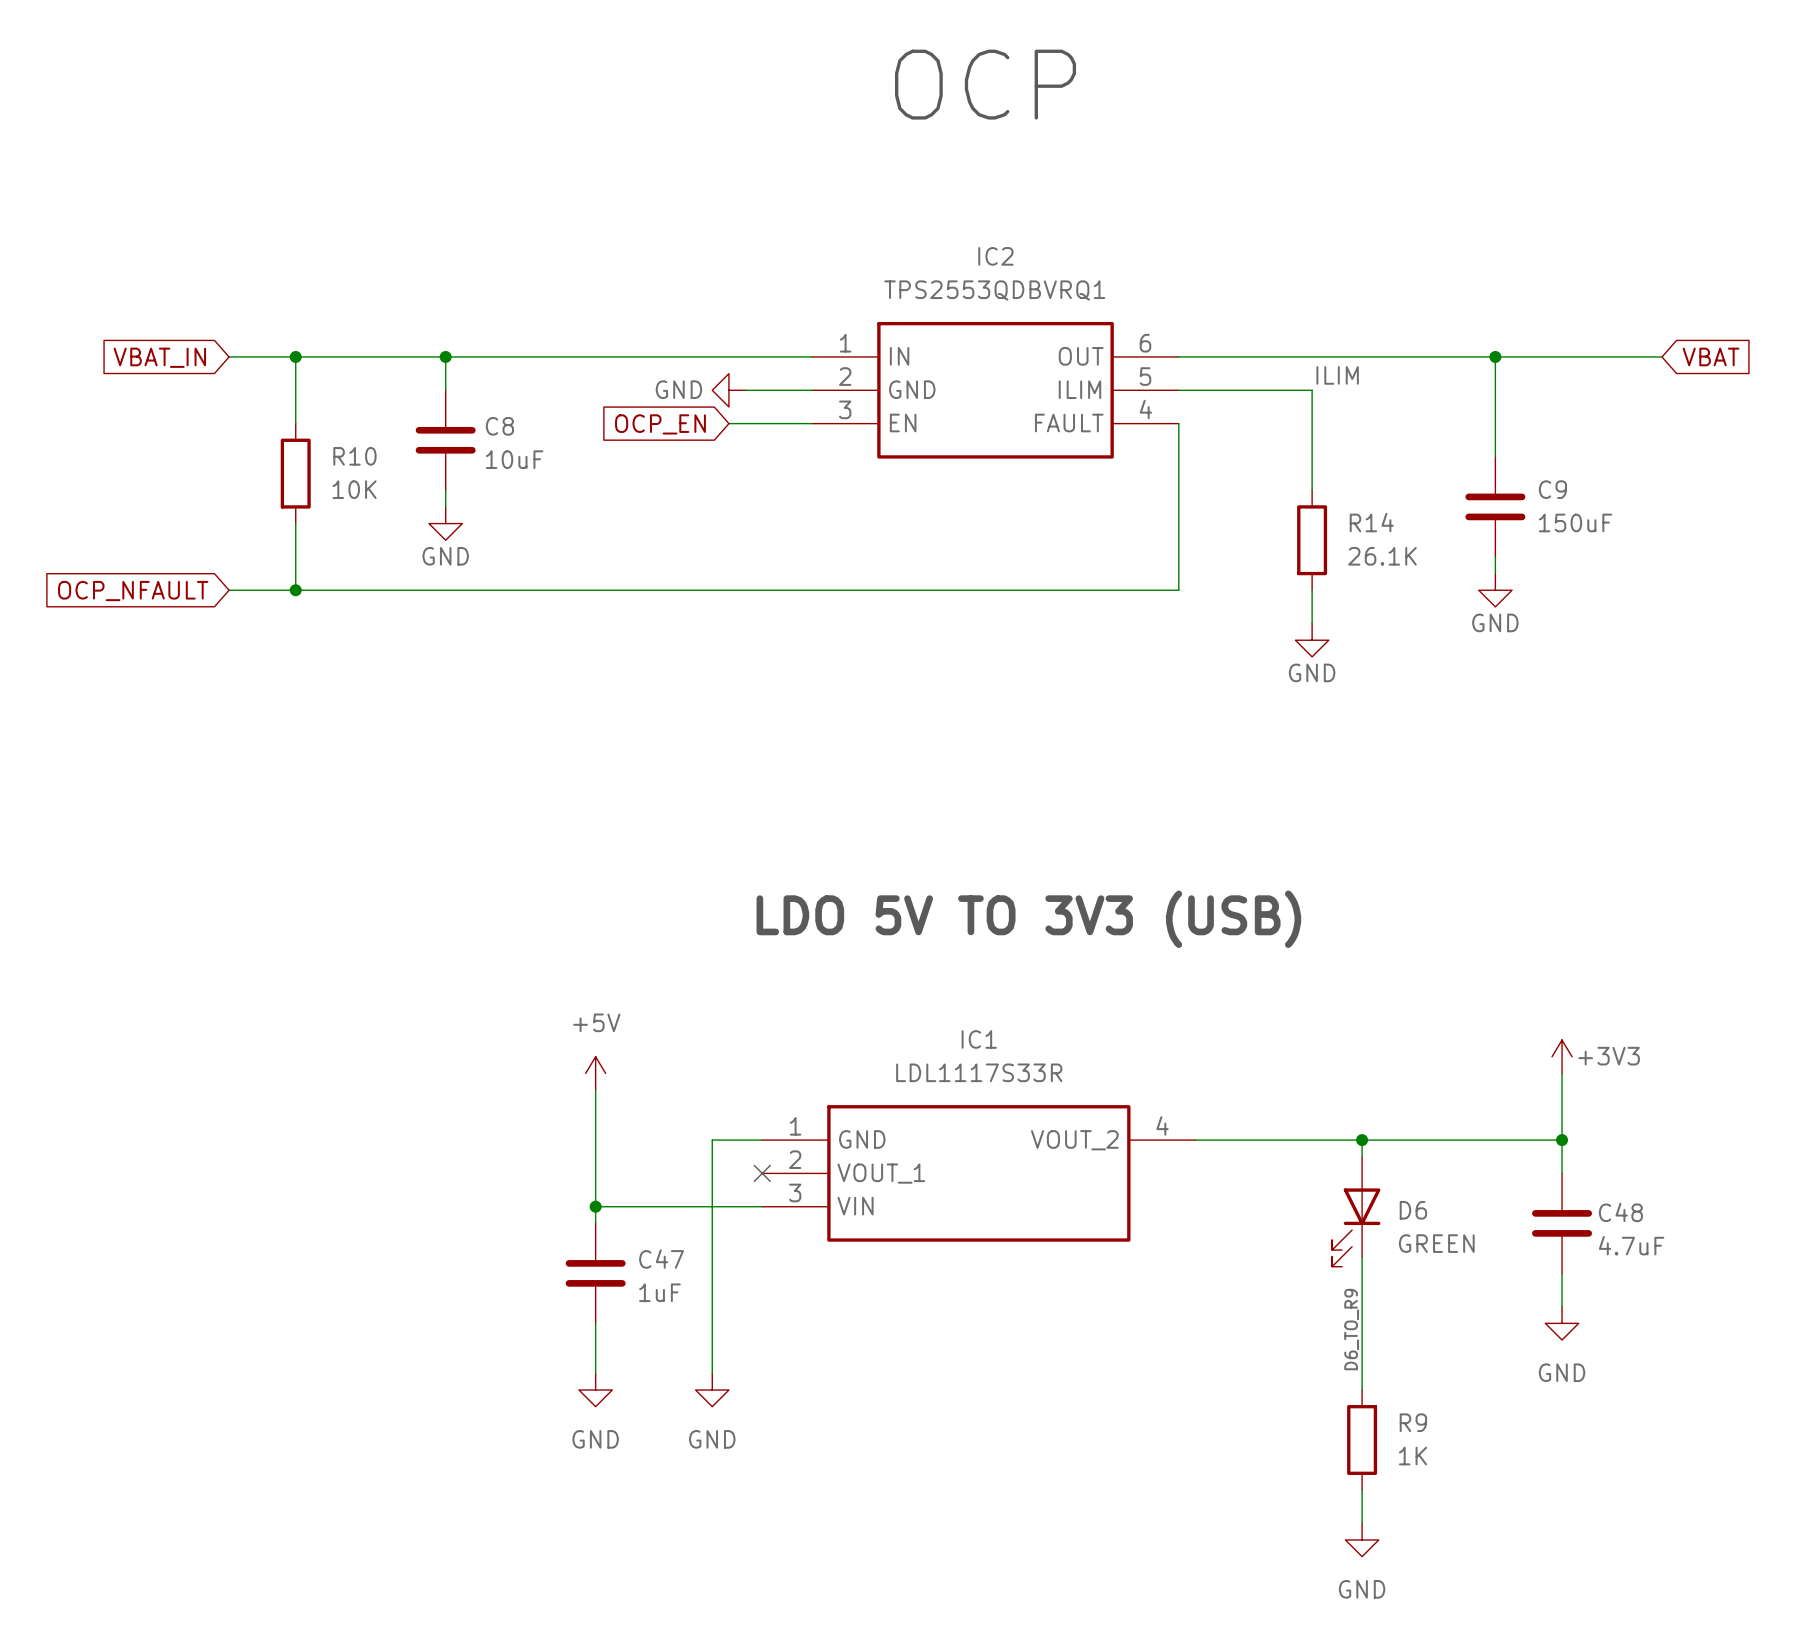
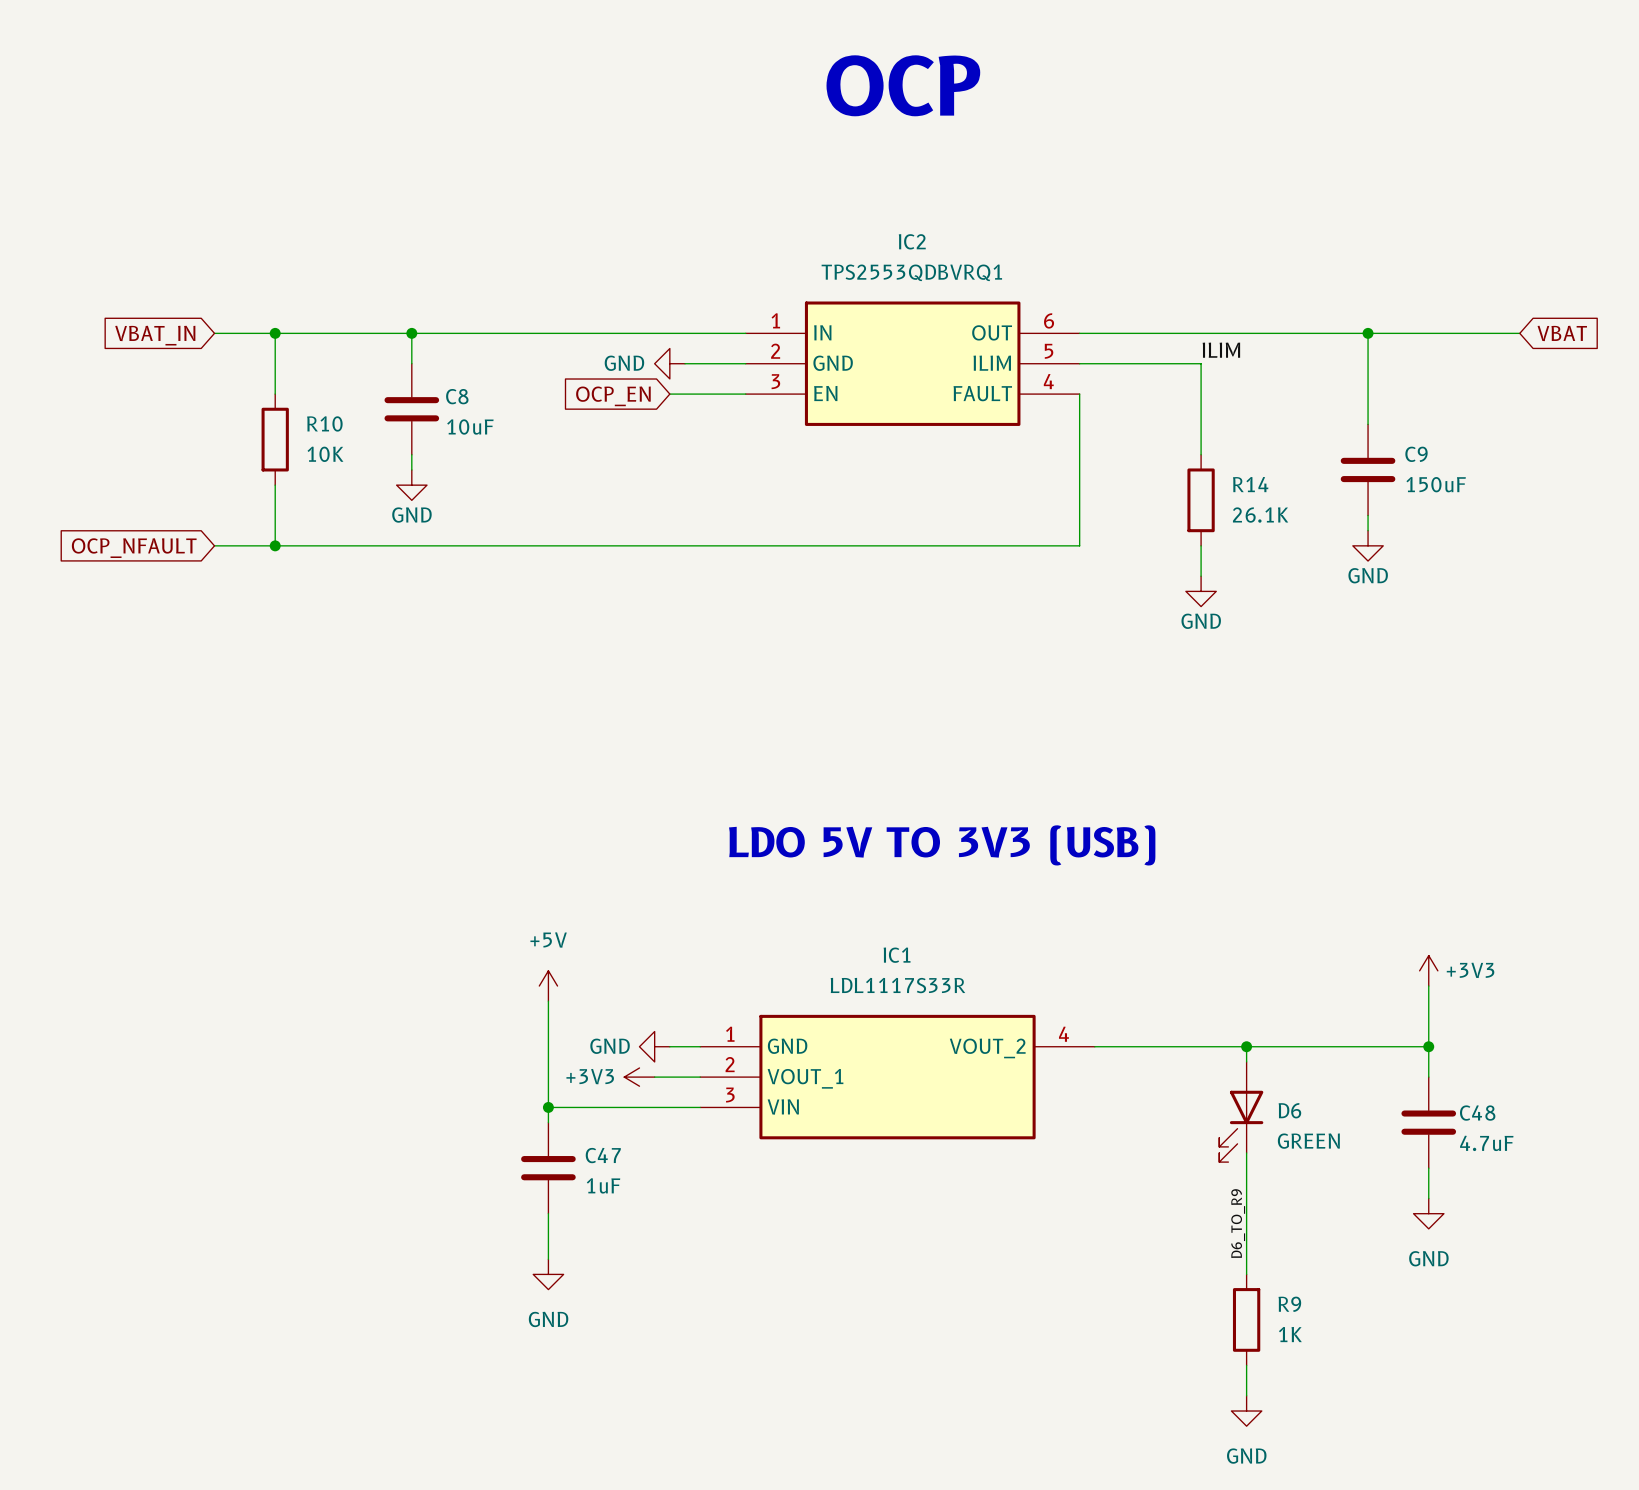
wire: (728, 1140) (712, 1140) (712, 1373) -> none
power symbol: none -> +3V3 (639, 1077)
wire: none -> (654, 1077) (700, 1077)
no-connect mark: (762, 1173) -> none
power symbol rotation: 0° (712, 1390) -> 90° clockwise (654, 1046)
power symbol position: GND (712, 1390) -> GND (654, 1046)

